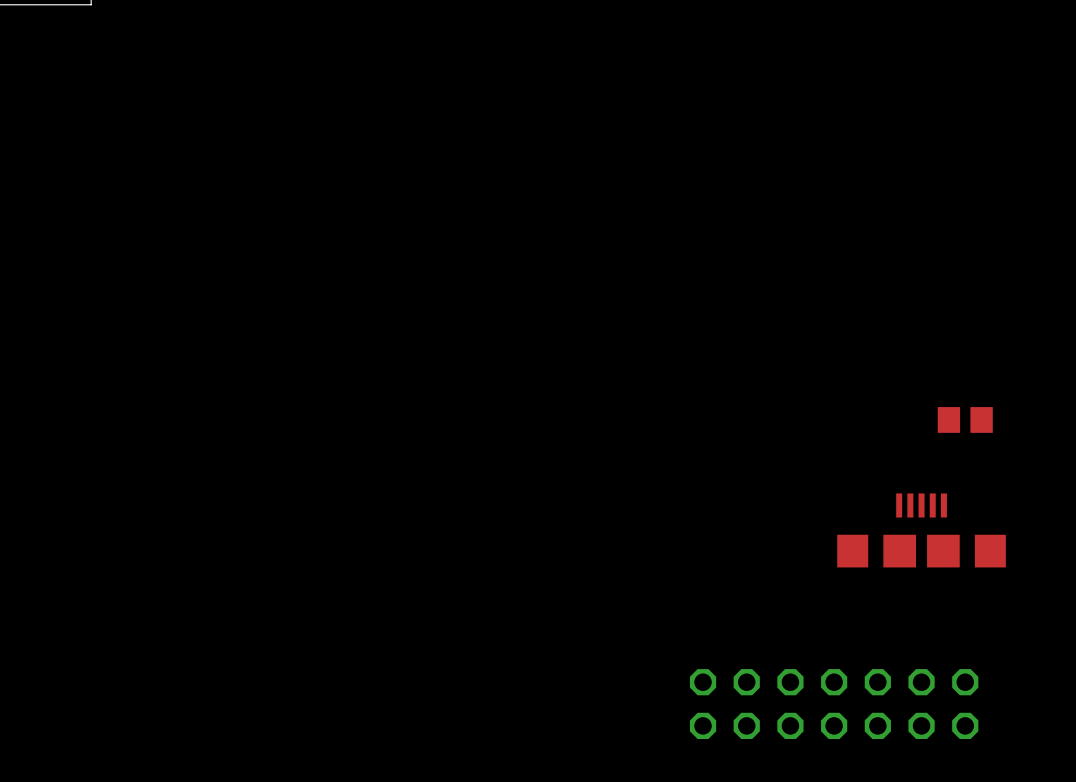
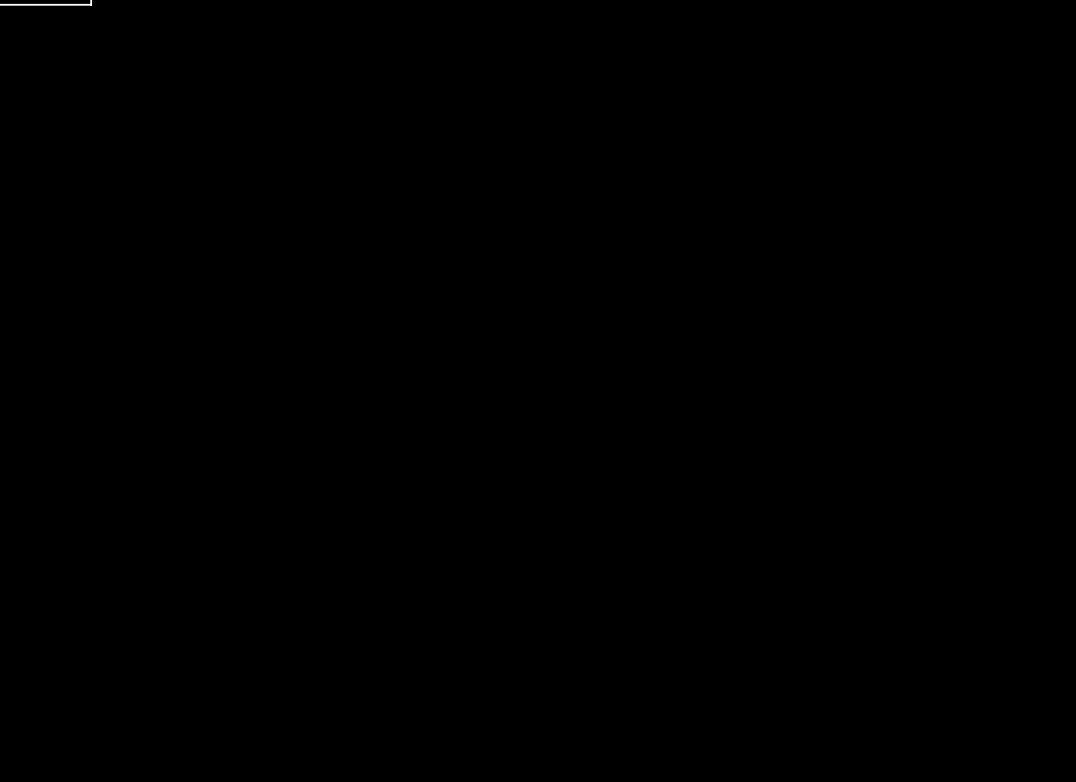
part: (965, 419) -> none
part: (921, 530) -> none
part: (834, 704) -> none

